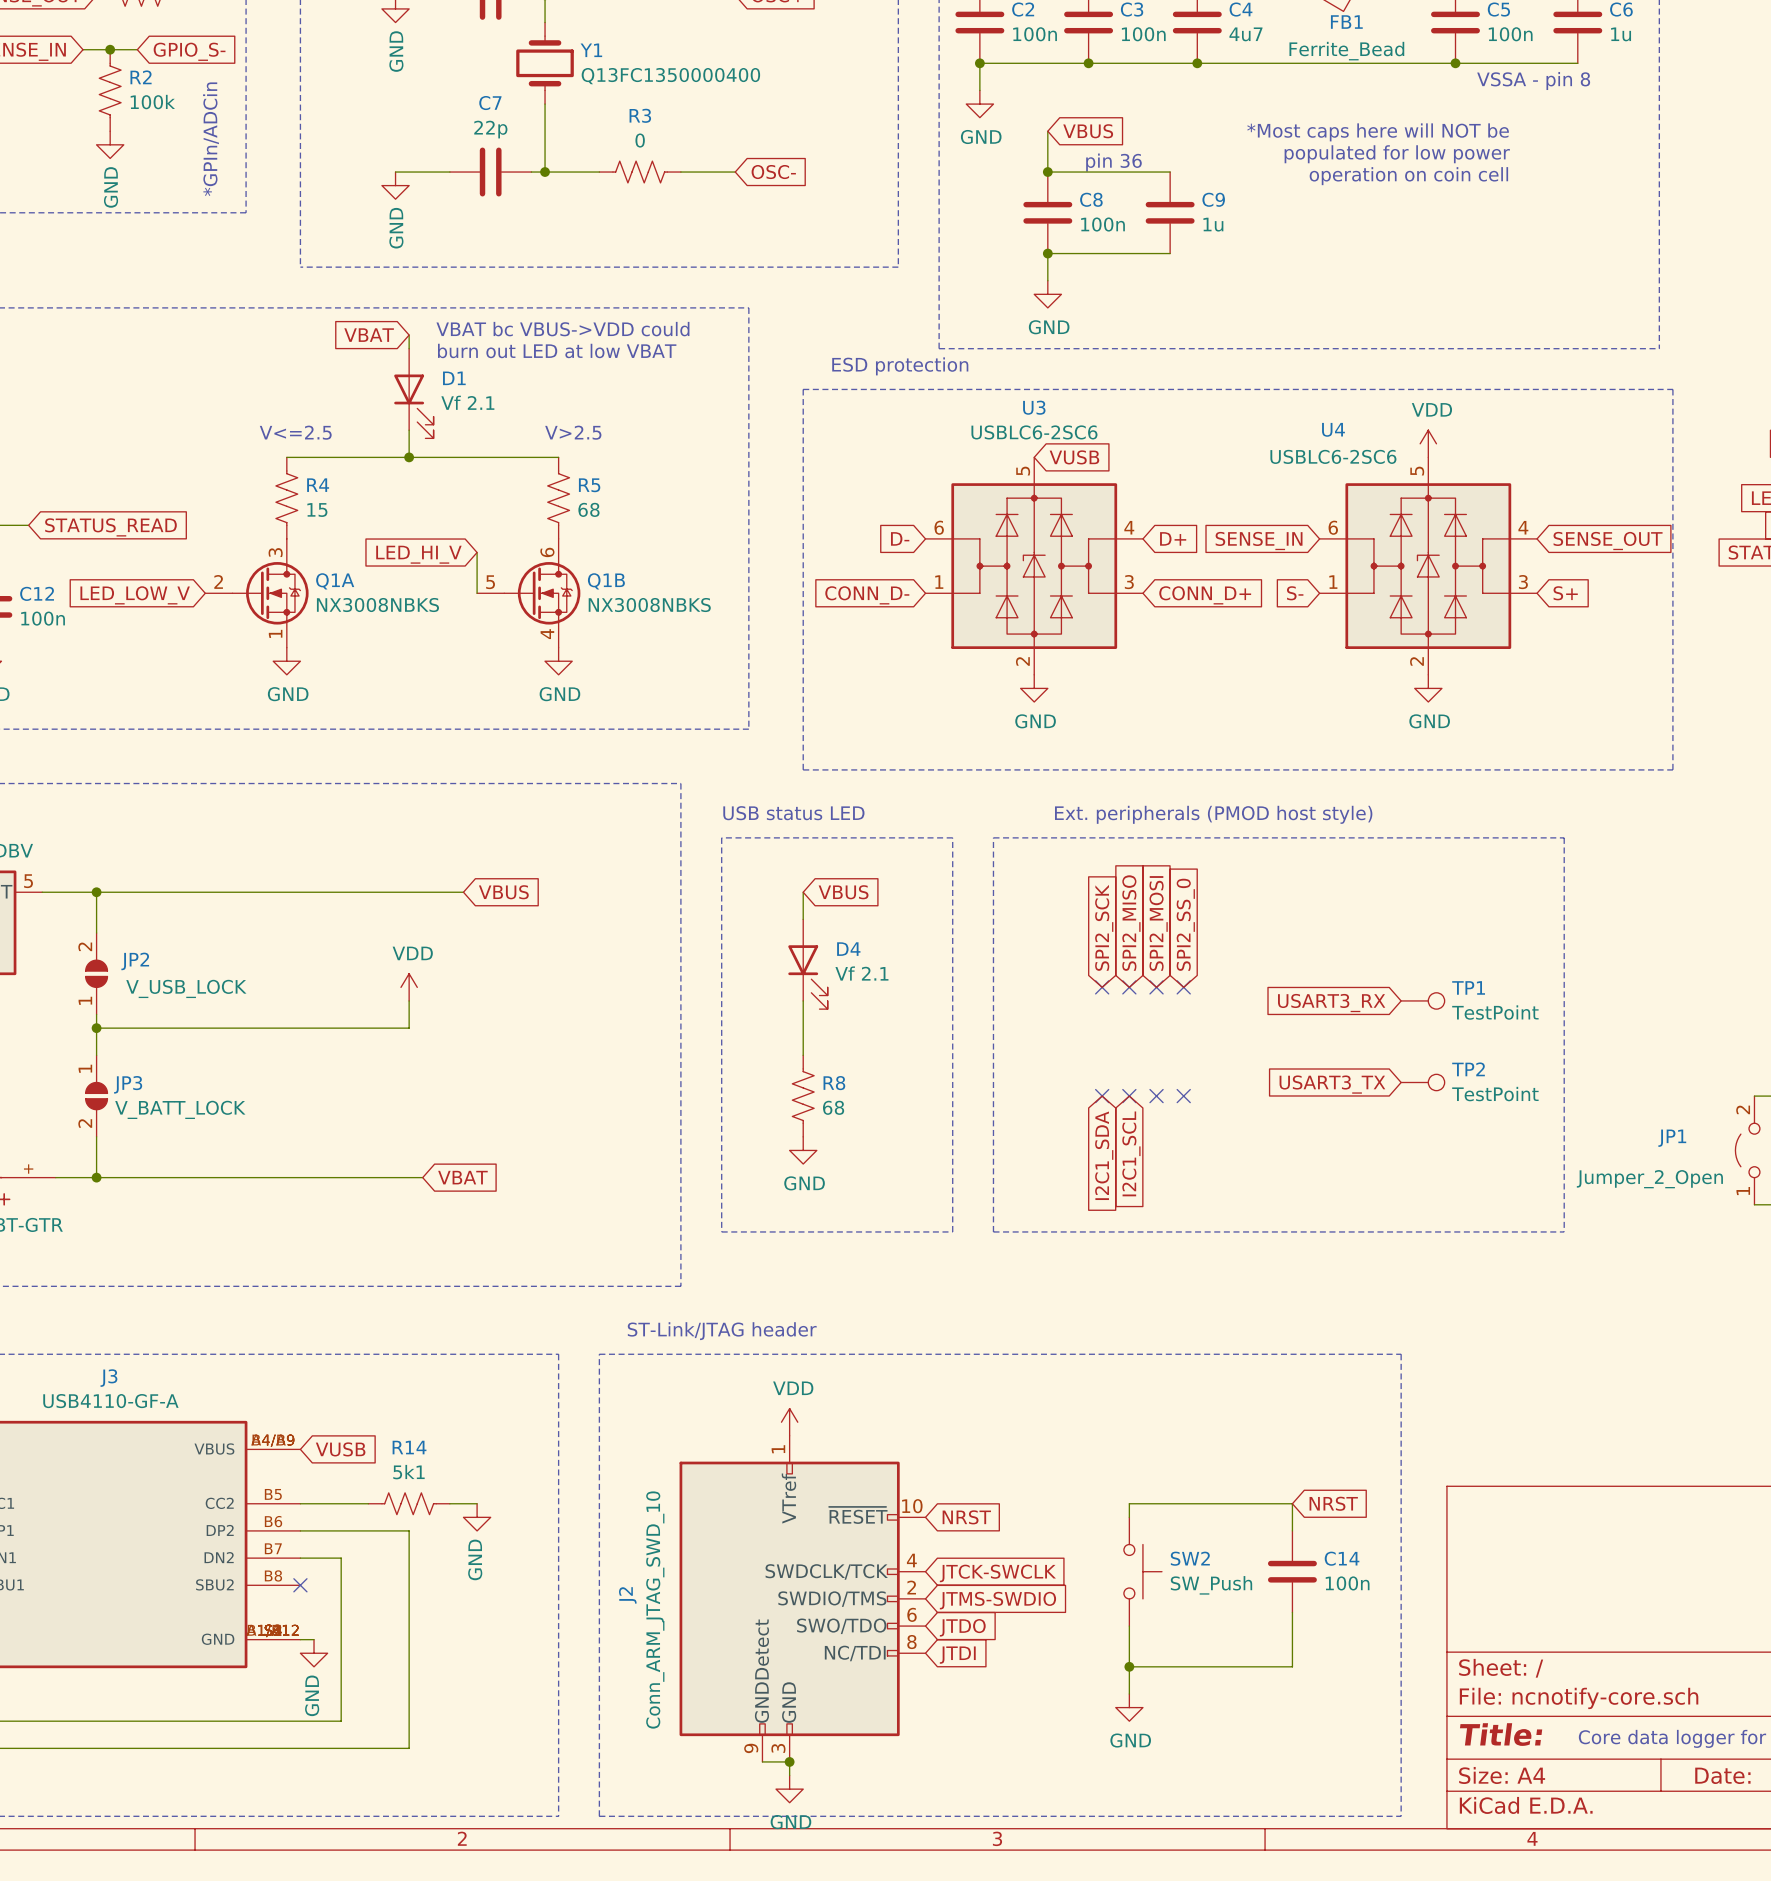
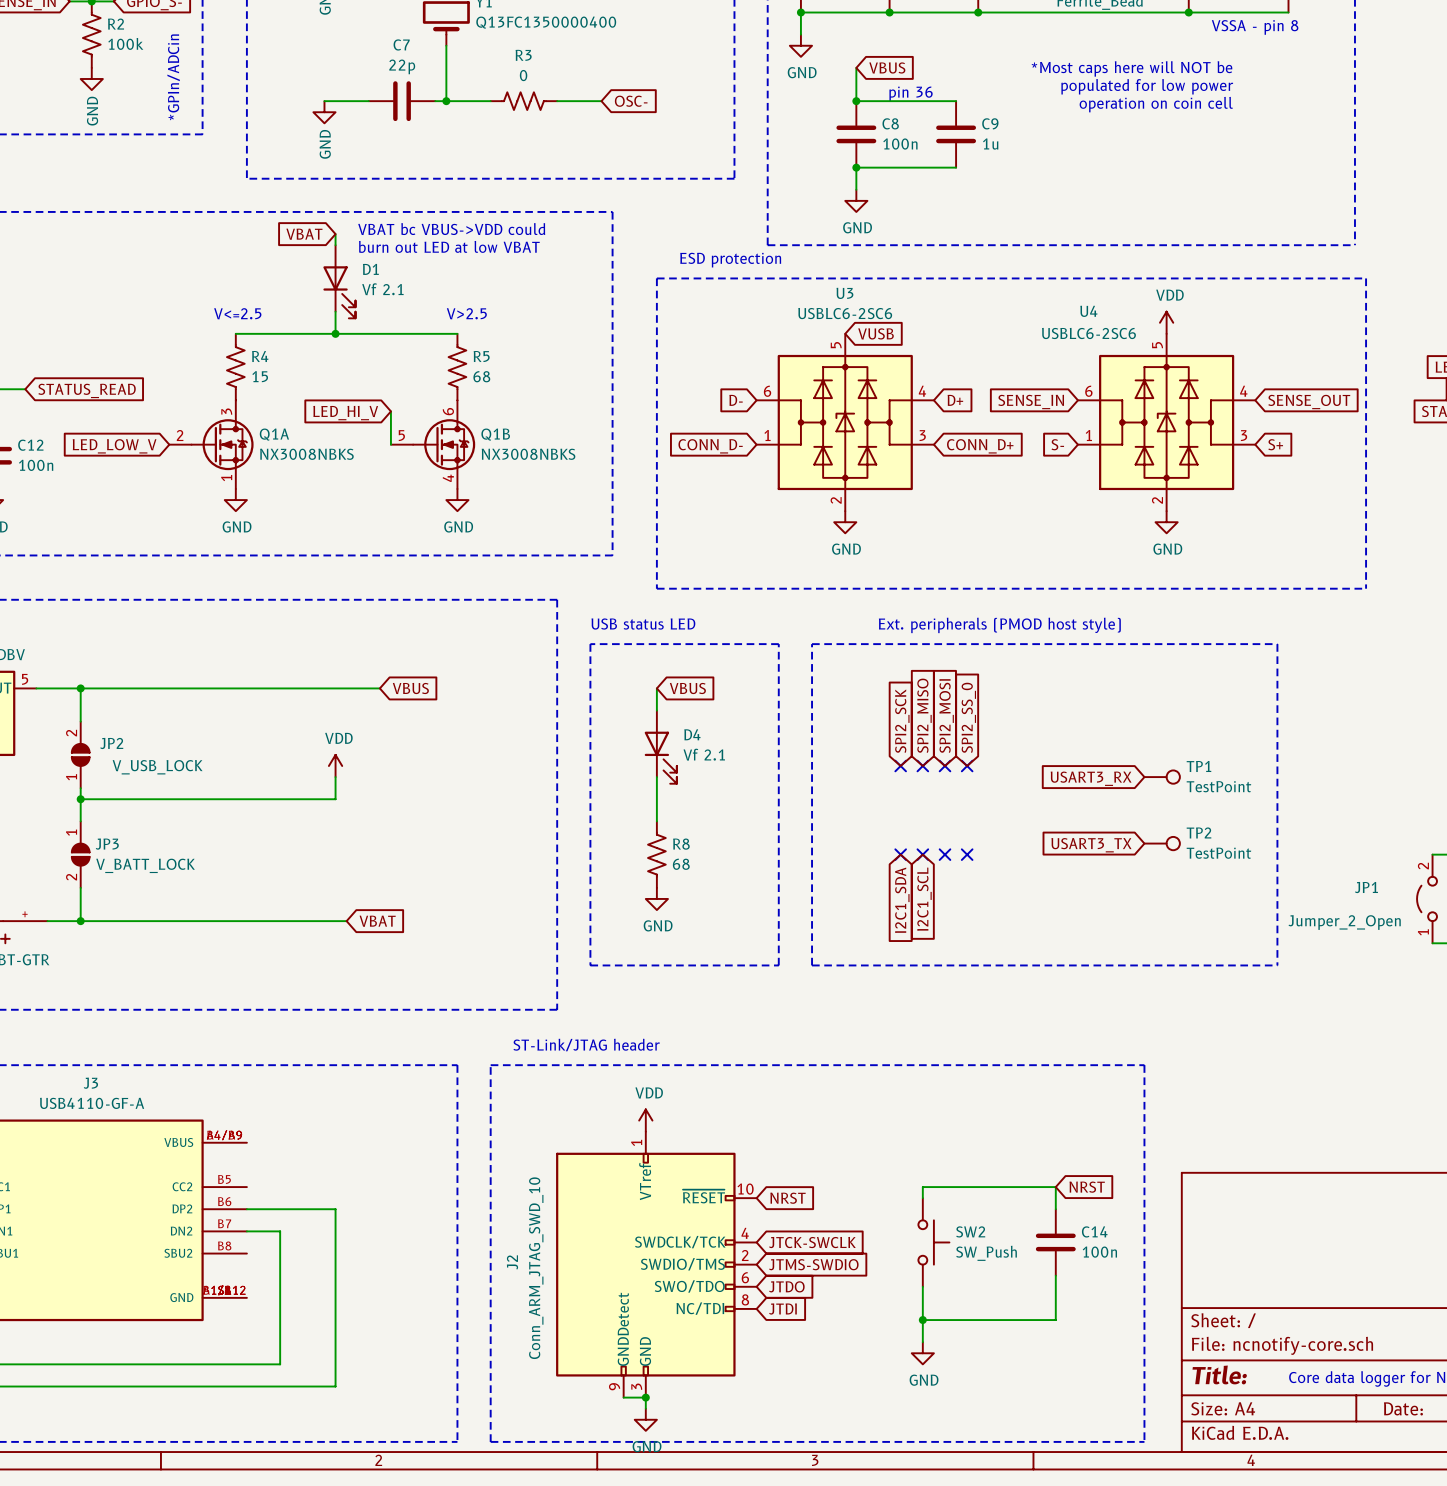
global label: VUSB (340, 1449) -> none
wire: (300, 1503) (368, 1503) -> none
R14: 5k1 (409, 1503) -> none
wire: (449, 1503) (477, 1503) -> none
power symbol: GND (477, 1517) -> none
no-connect mark: (300, 1585) -> none
wire: (300, 1639) (314, 1639) -> none
power symbol: GND (314, 1653) -> none

